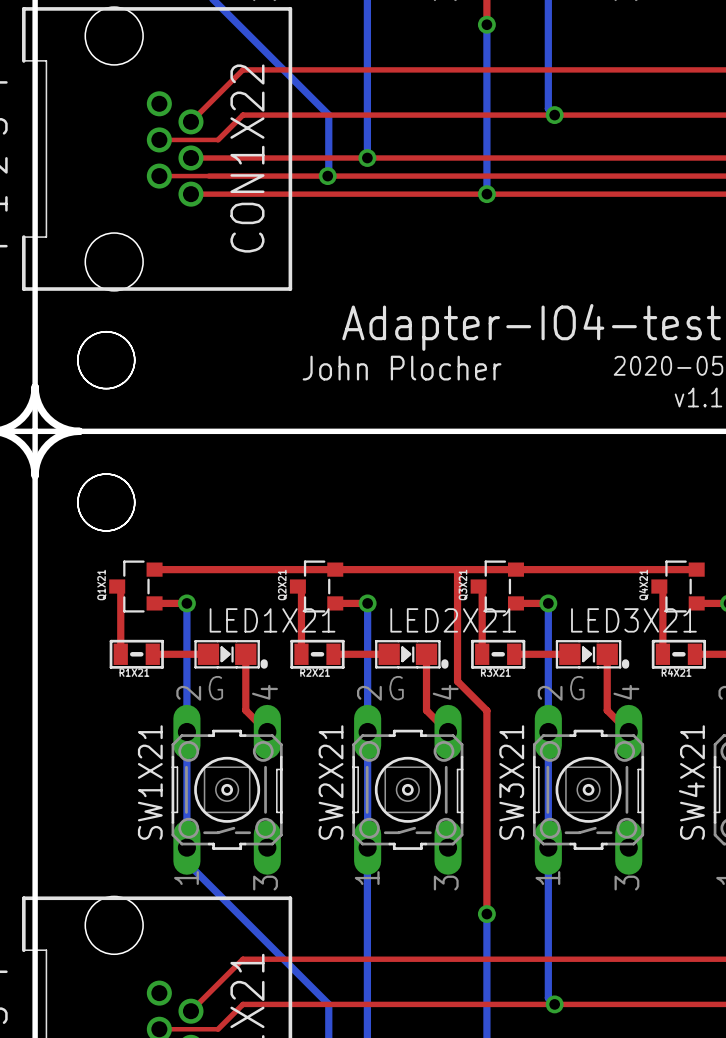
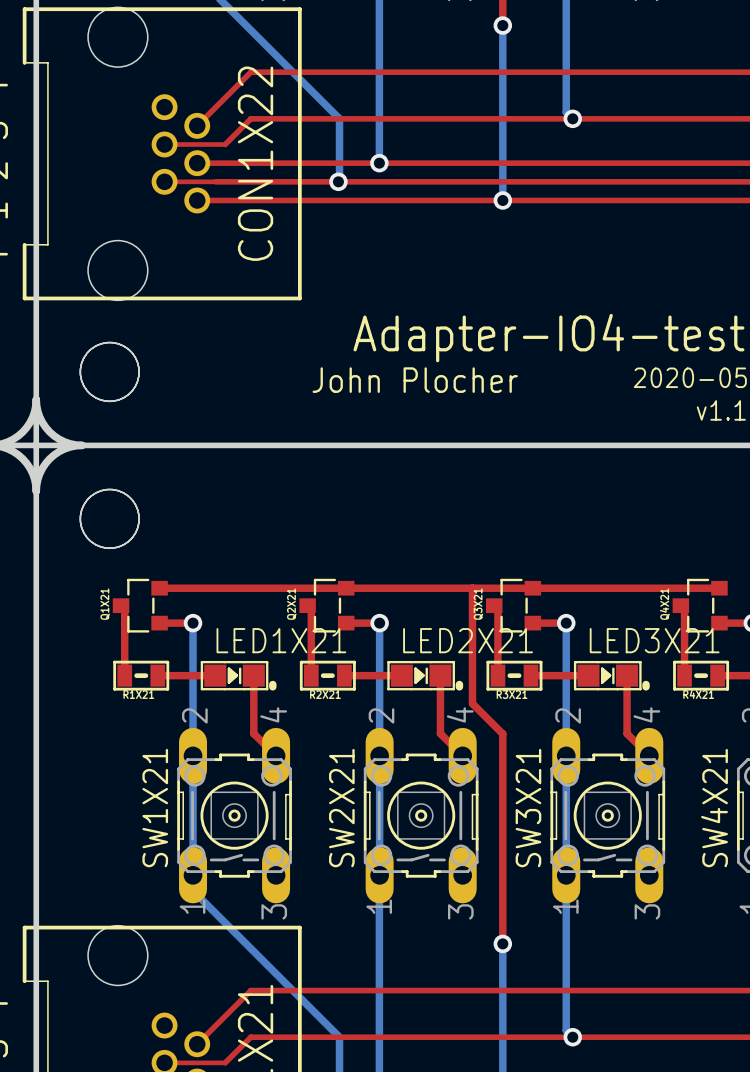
LED1X21 value: G (215, 688) -> none
LED2X21 value: G (396, 688) -> none
LED3X21 value: G (577, 688) -> none

